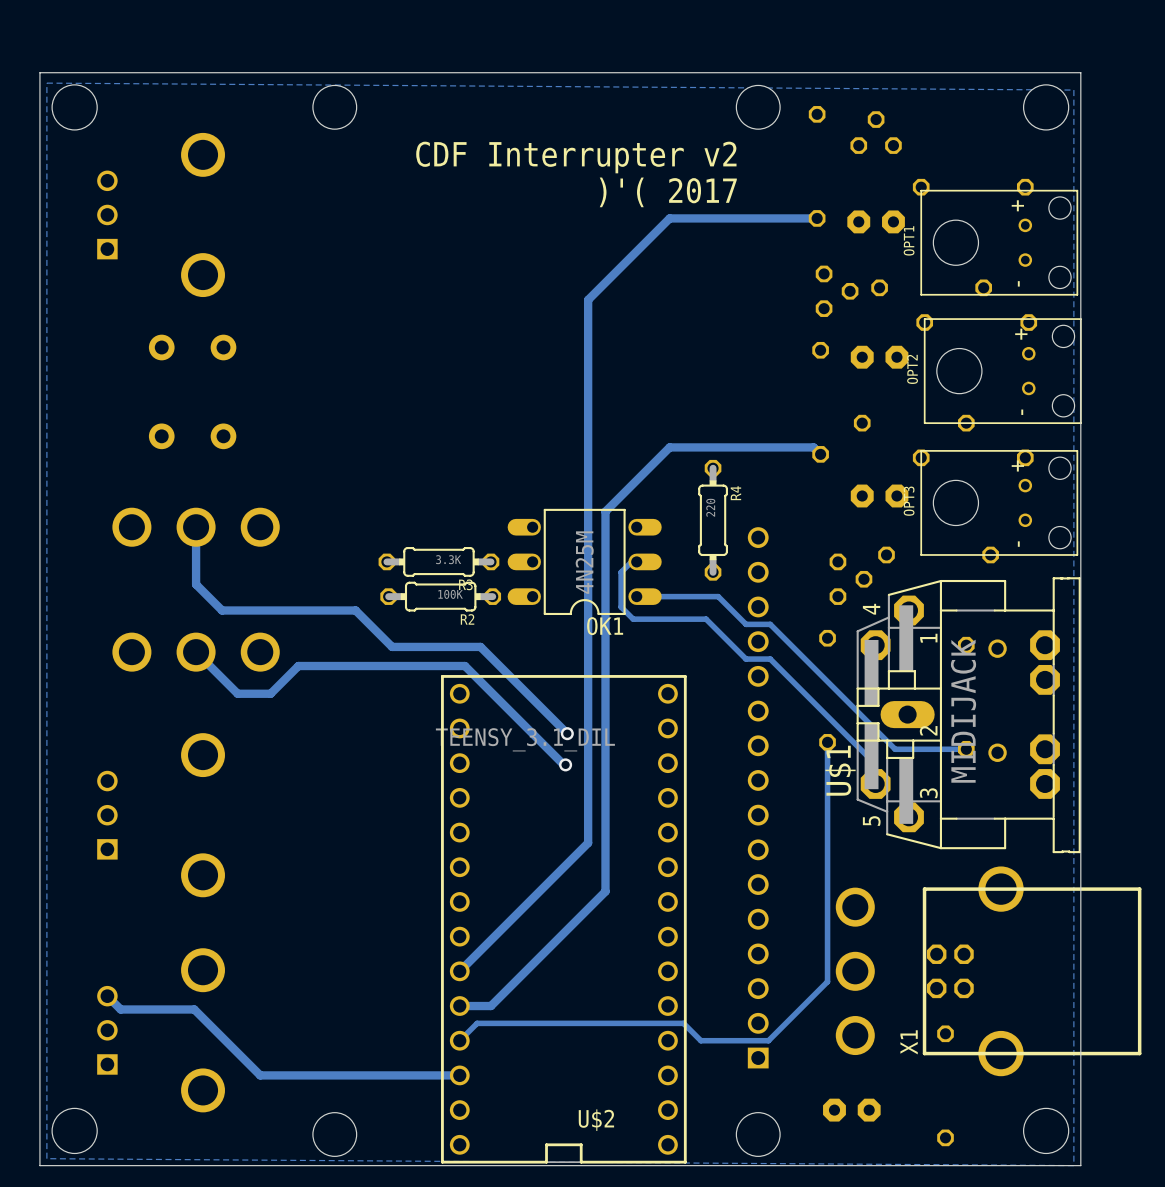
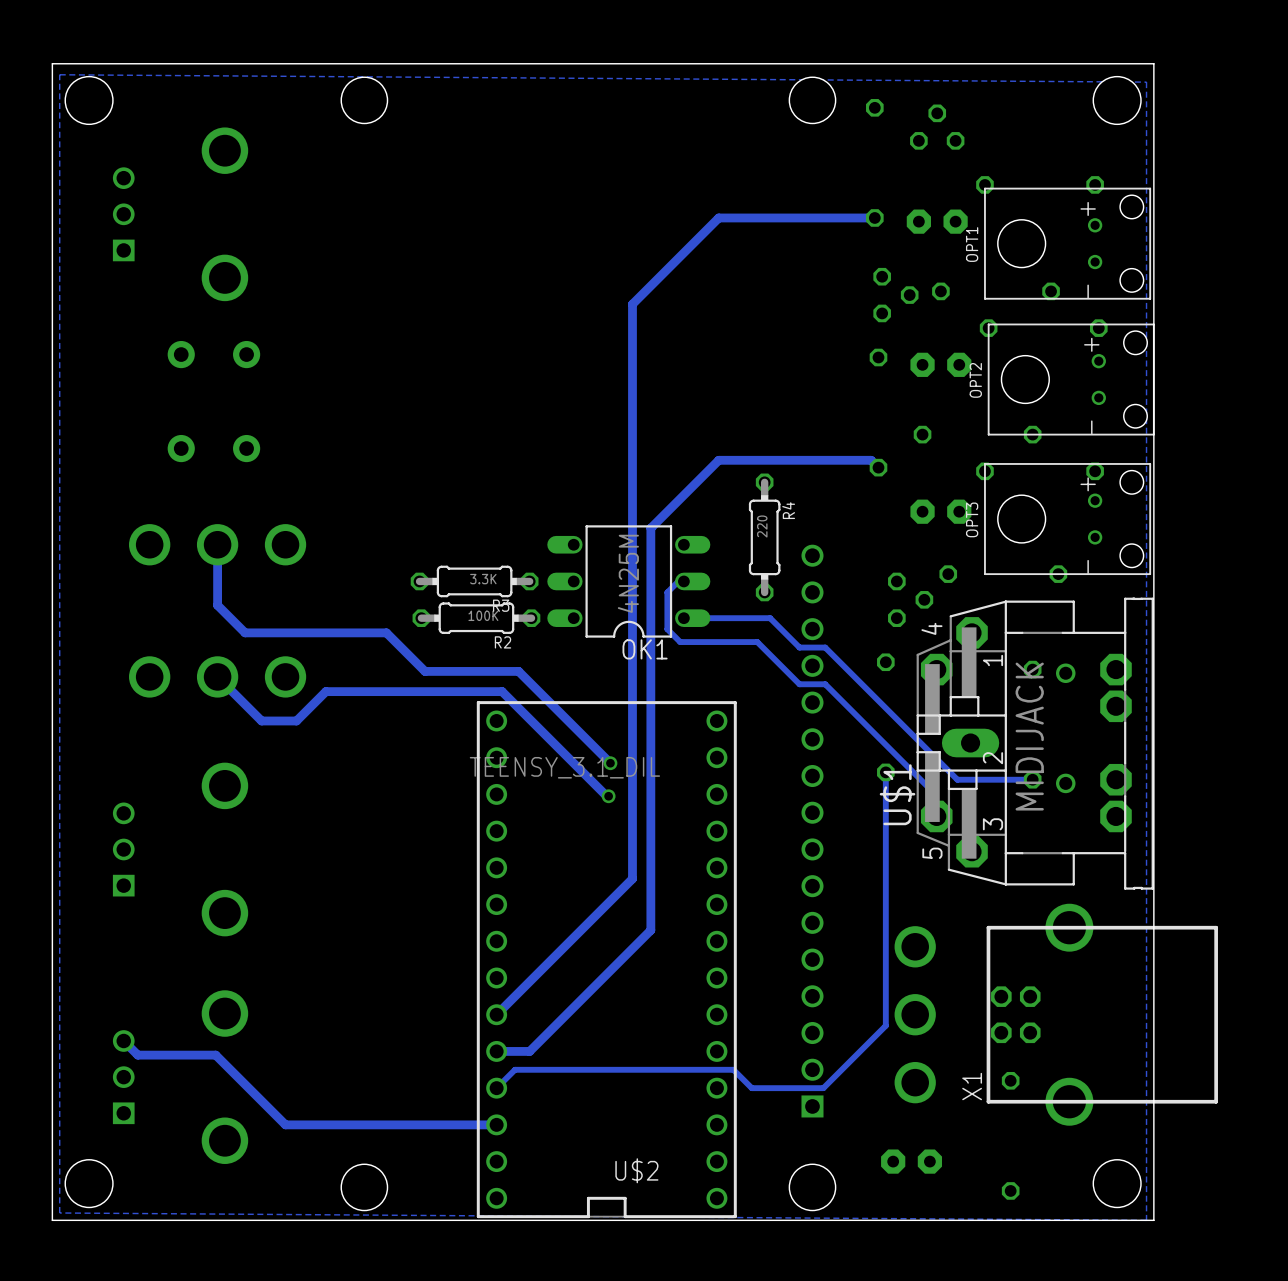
text: CDF Interrupter v2 (576, 157) -> none
text: )'( 2017 (668, 192) -> none

